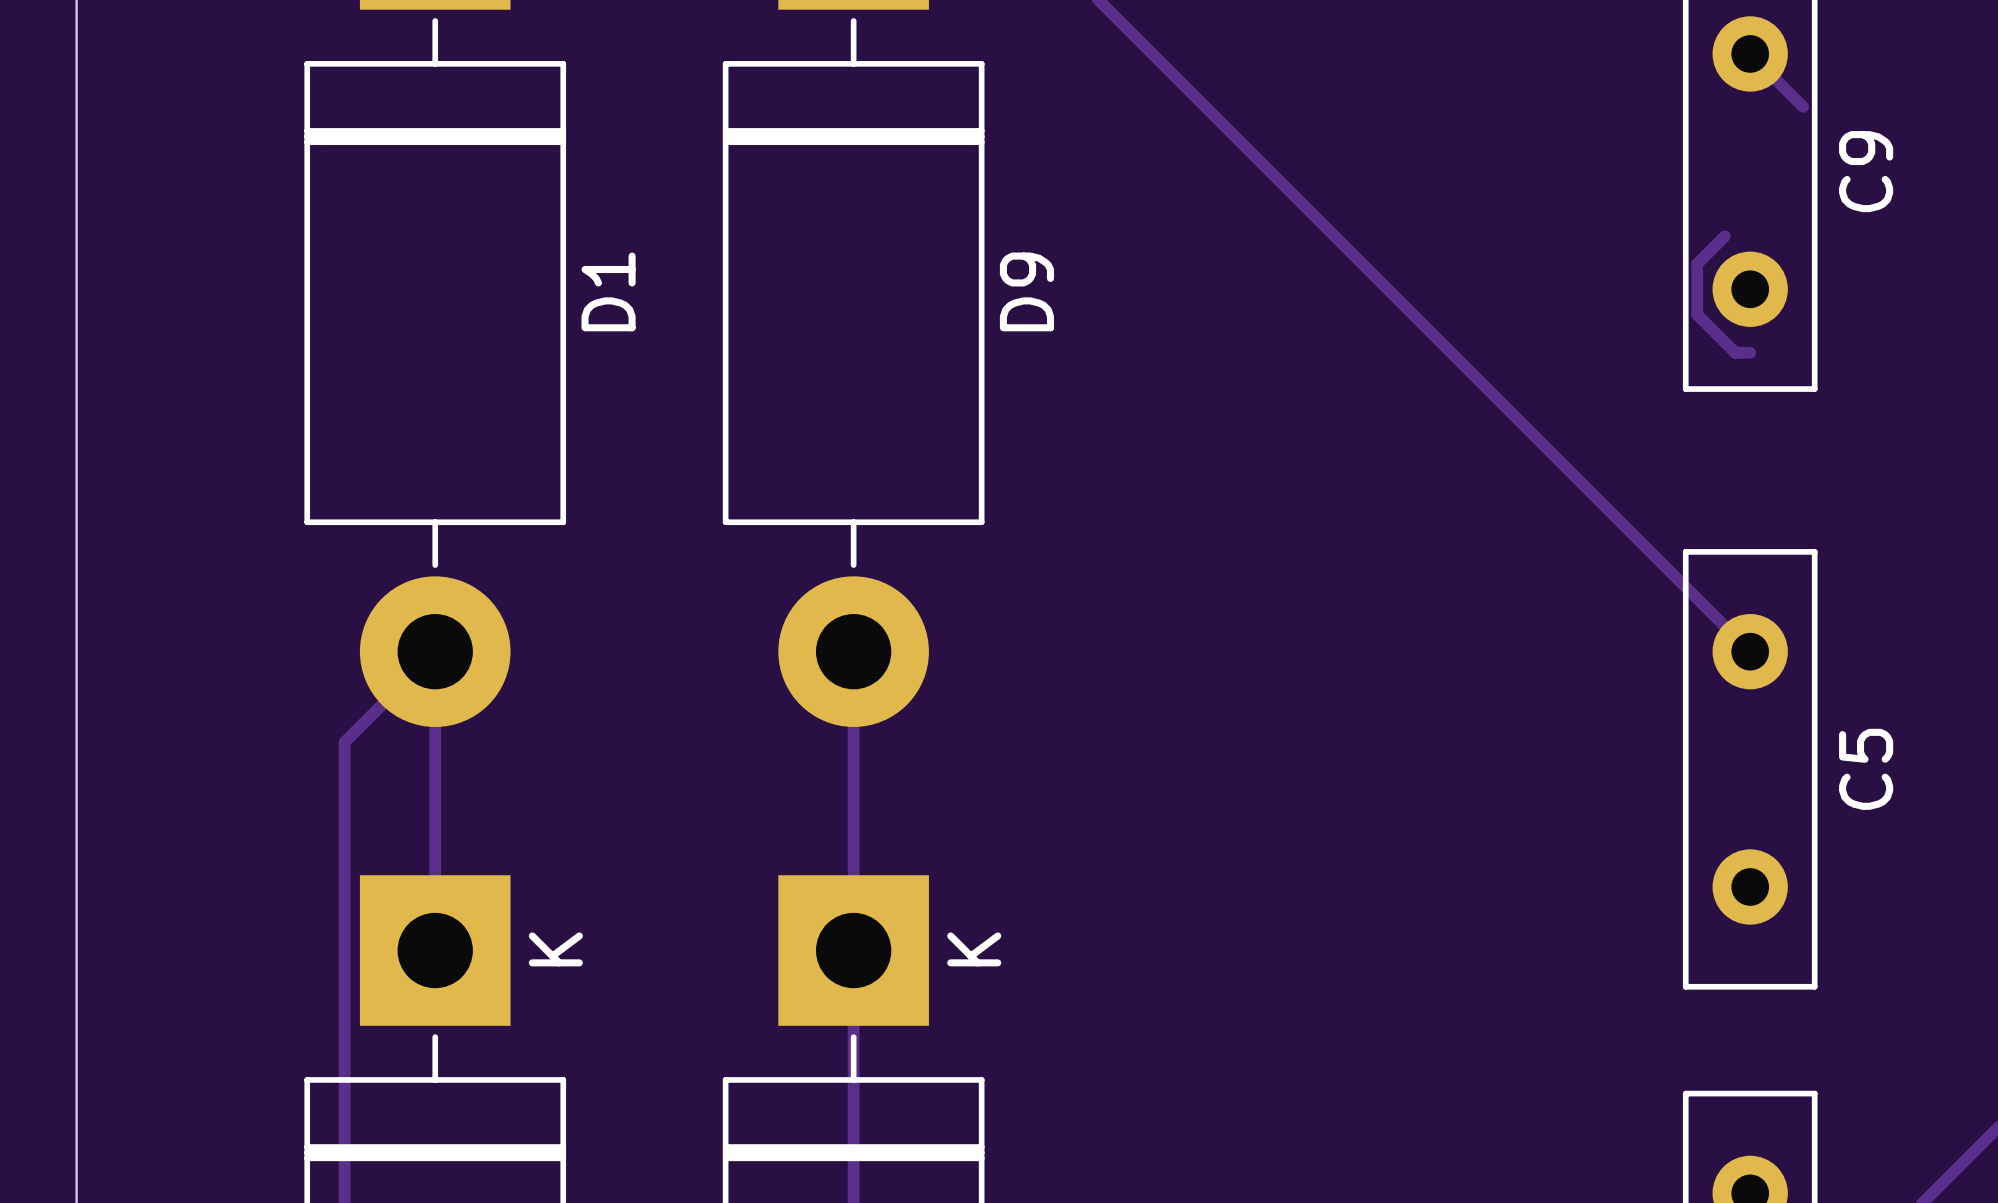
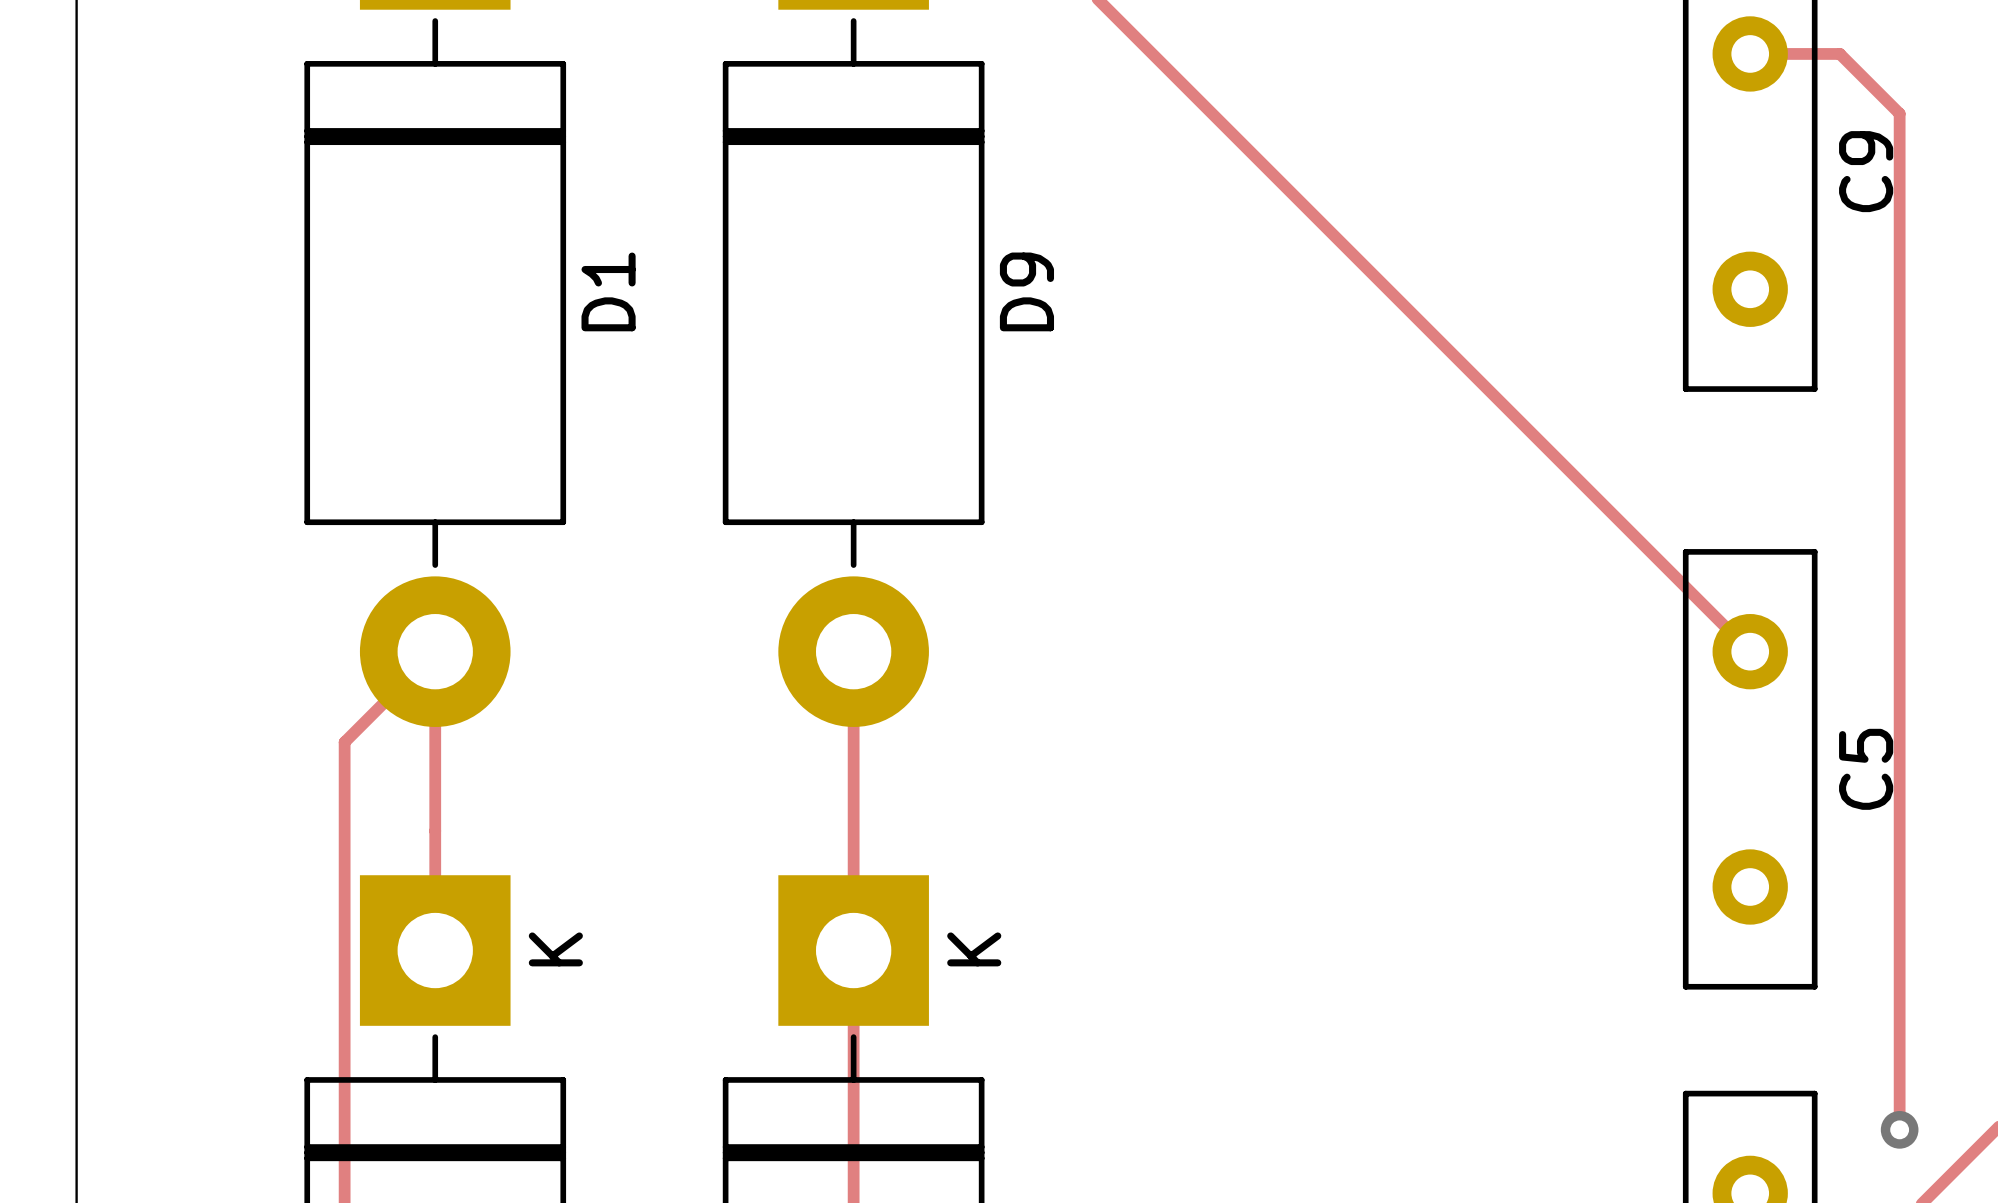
track: (1750, 53) (1803, 106) -> (1750, 53) (1839, 53) (1899, 113) (1899, 1129)
track: (1724, 236) (1697, 263) (1697, 314) (1735, 352) (1750, 352) -> none
via: none -> (1899, 1129)

